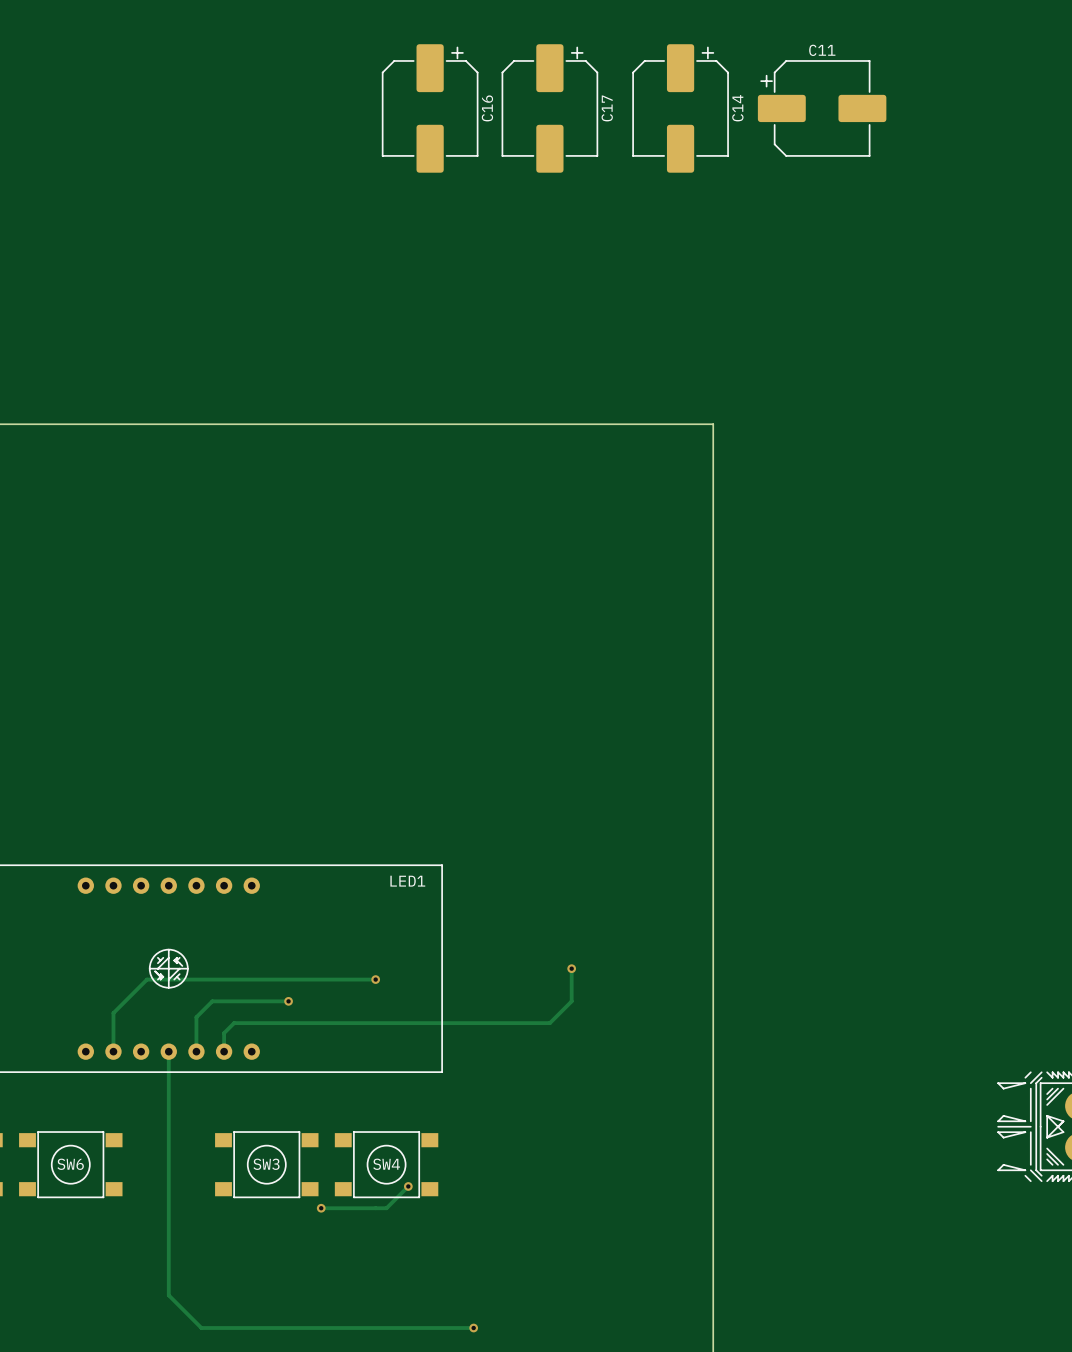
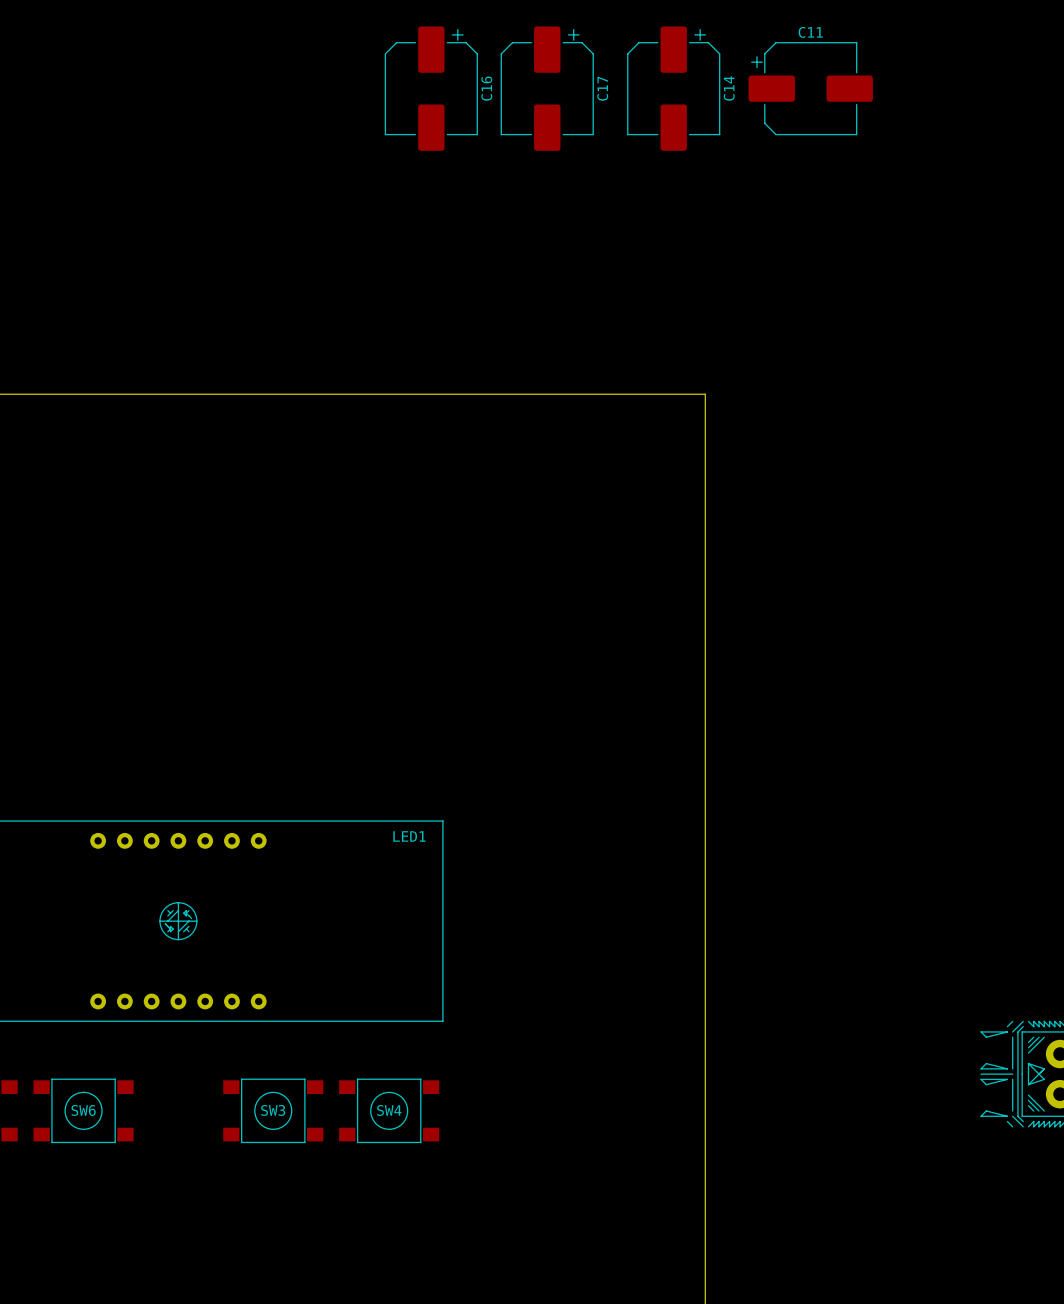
track: (571, 968) (571, 1001) (549, 1023) (234, 1023) (224, 1033) (224, 1051) -> none
via: (571, 968) -> none
track: (375, 979) (147, 979) (113, 1013) (113, 1051) -> none
via: (375, 979) -> none
track: (288, 1001) (212, 1001) (196, 1017) (196, 1051) -> none
via: (288, 1001) -> none
track: (168, 1051) (168, 1295) (201, 1328) (473, 1328) -> none
track: (408, 1186) (386, 1208) (321, 1208) -> none
via: (408, 1186) -> none
via: (321, 1208) -> none
via: (473, 1328) -> none

